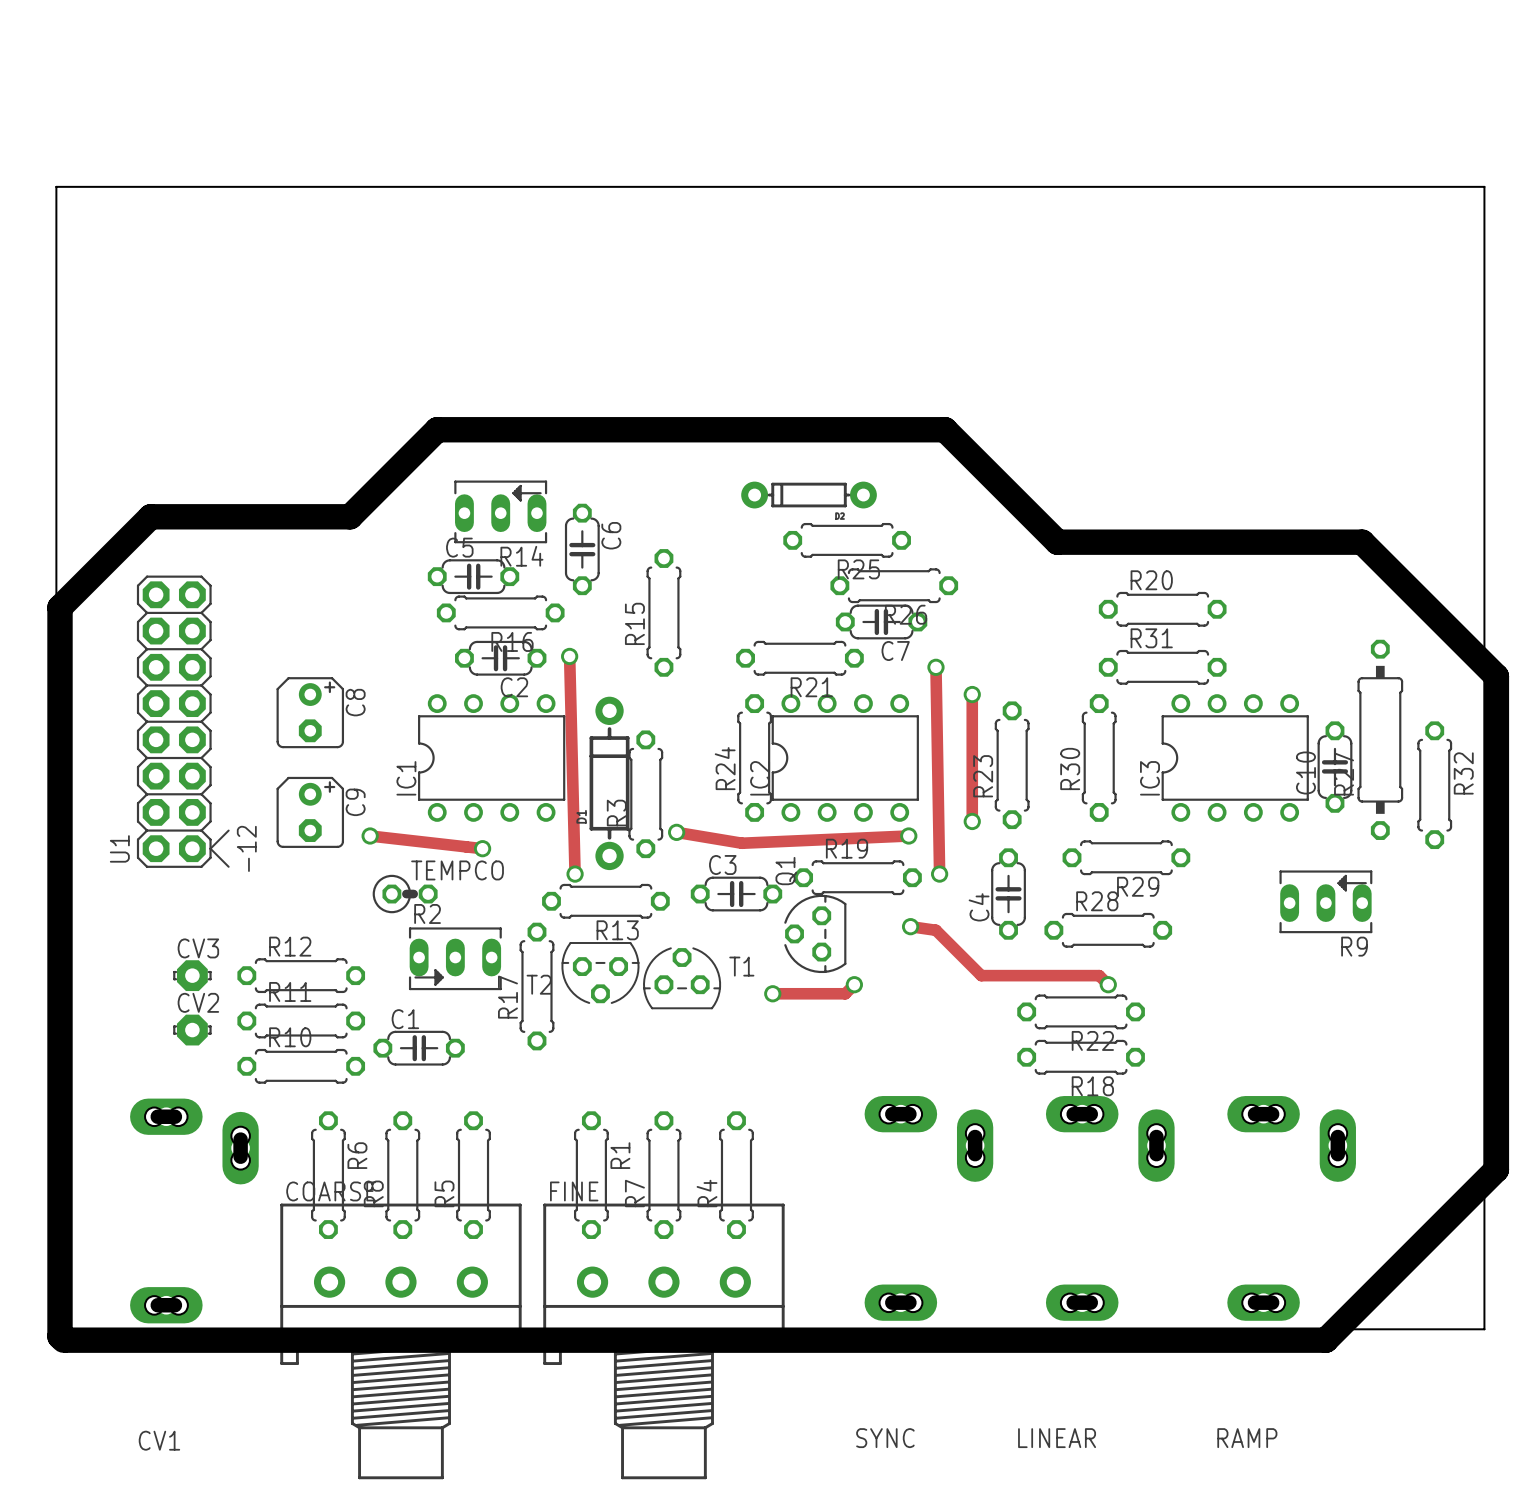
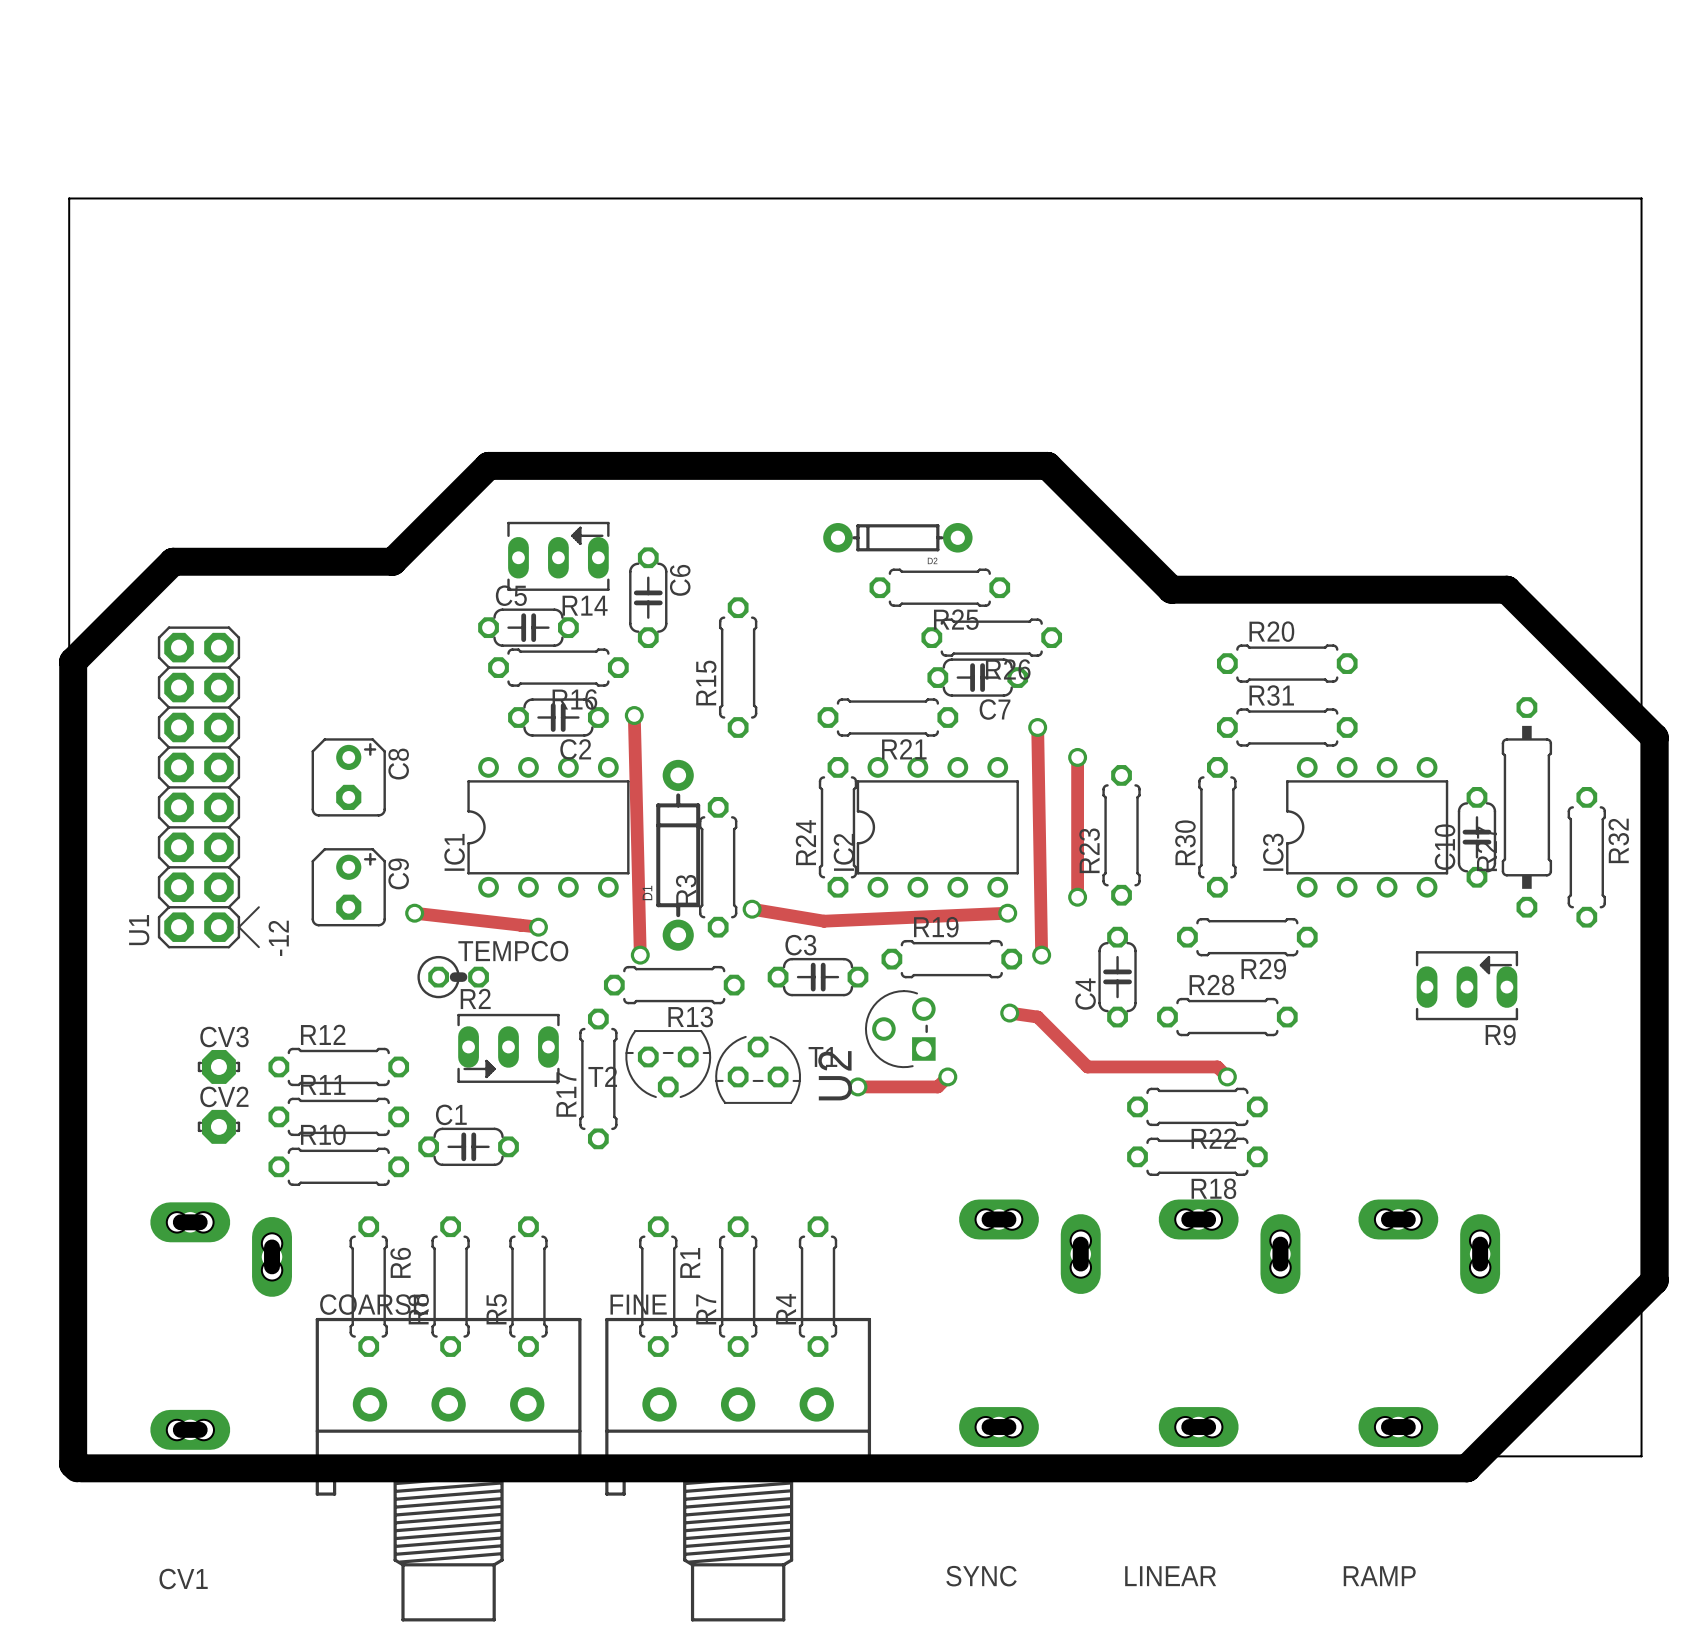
Q1: (815, 933) -> none
U2: none -> (900, 1029)

